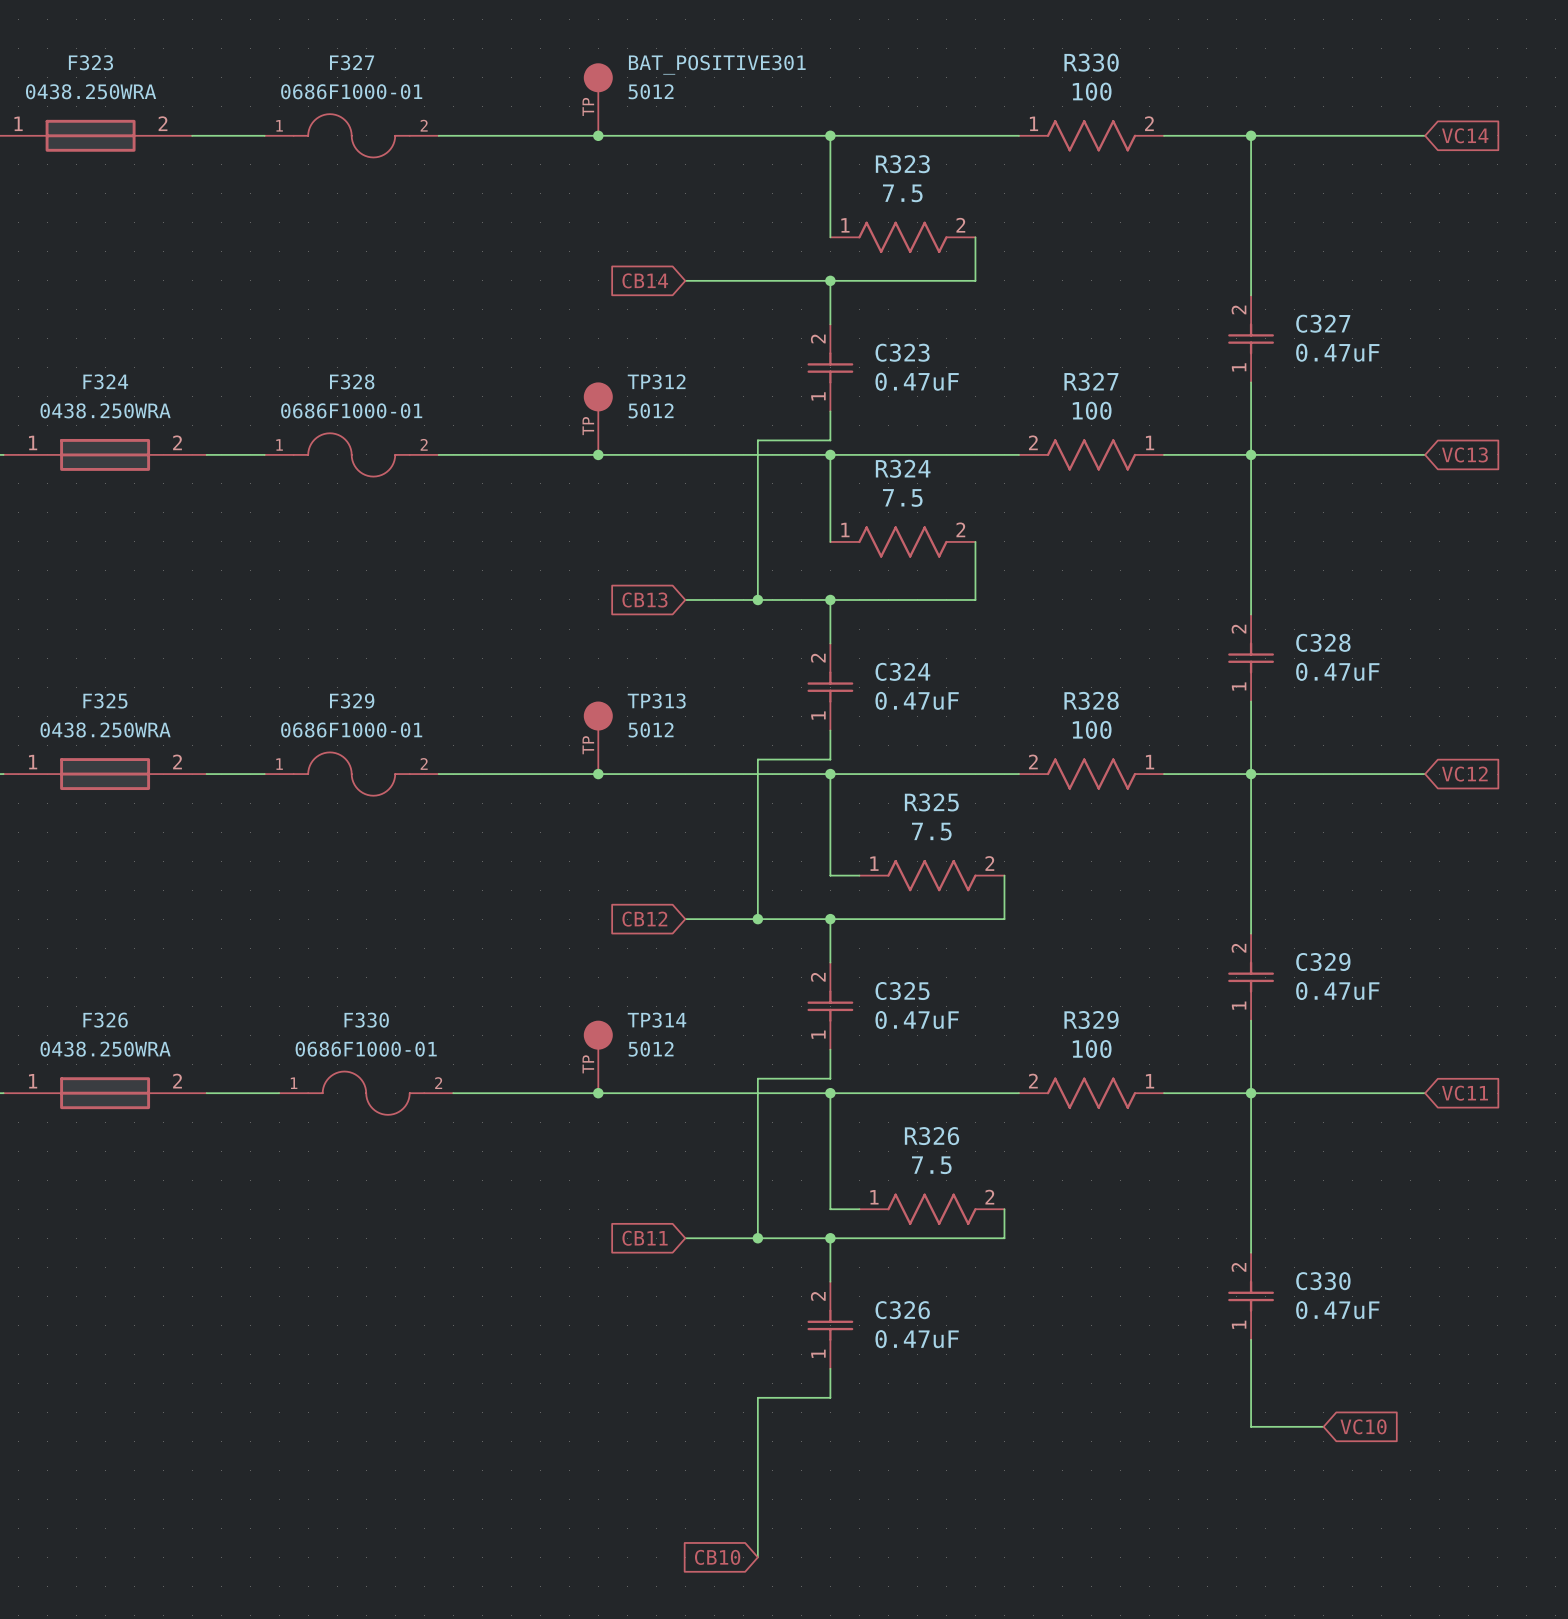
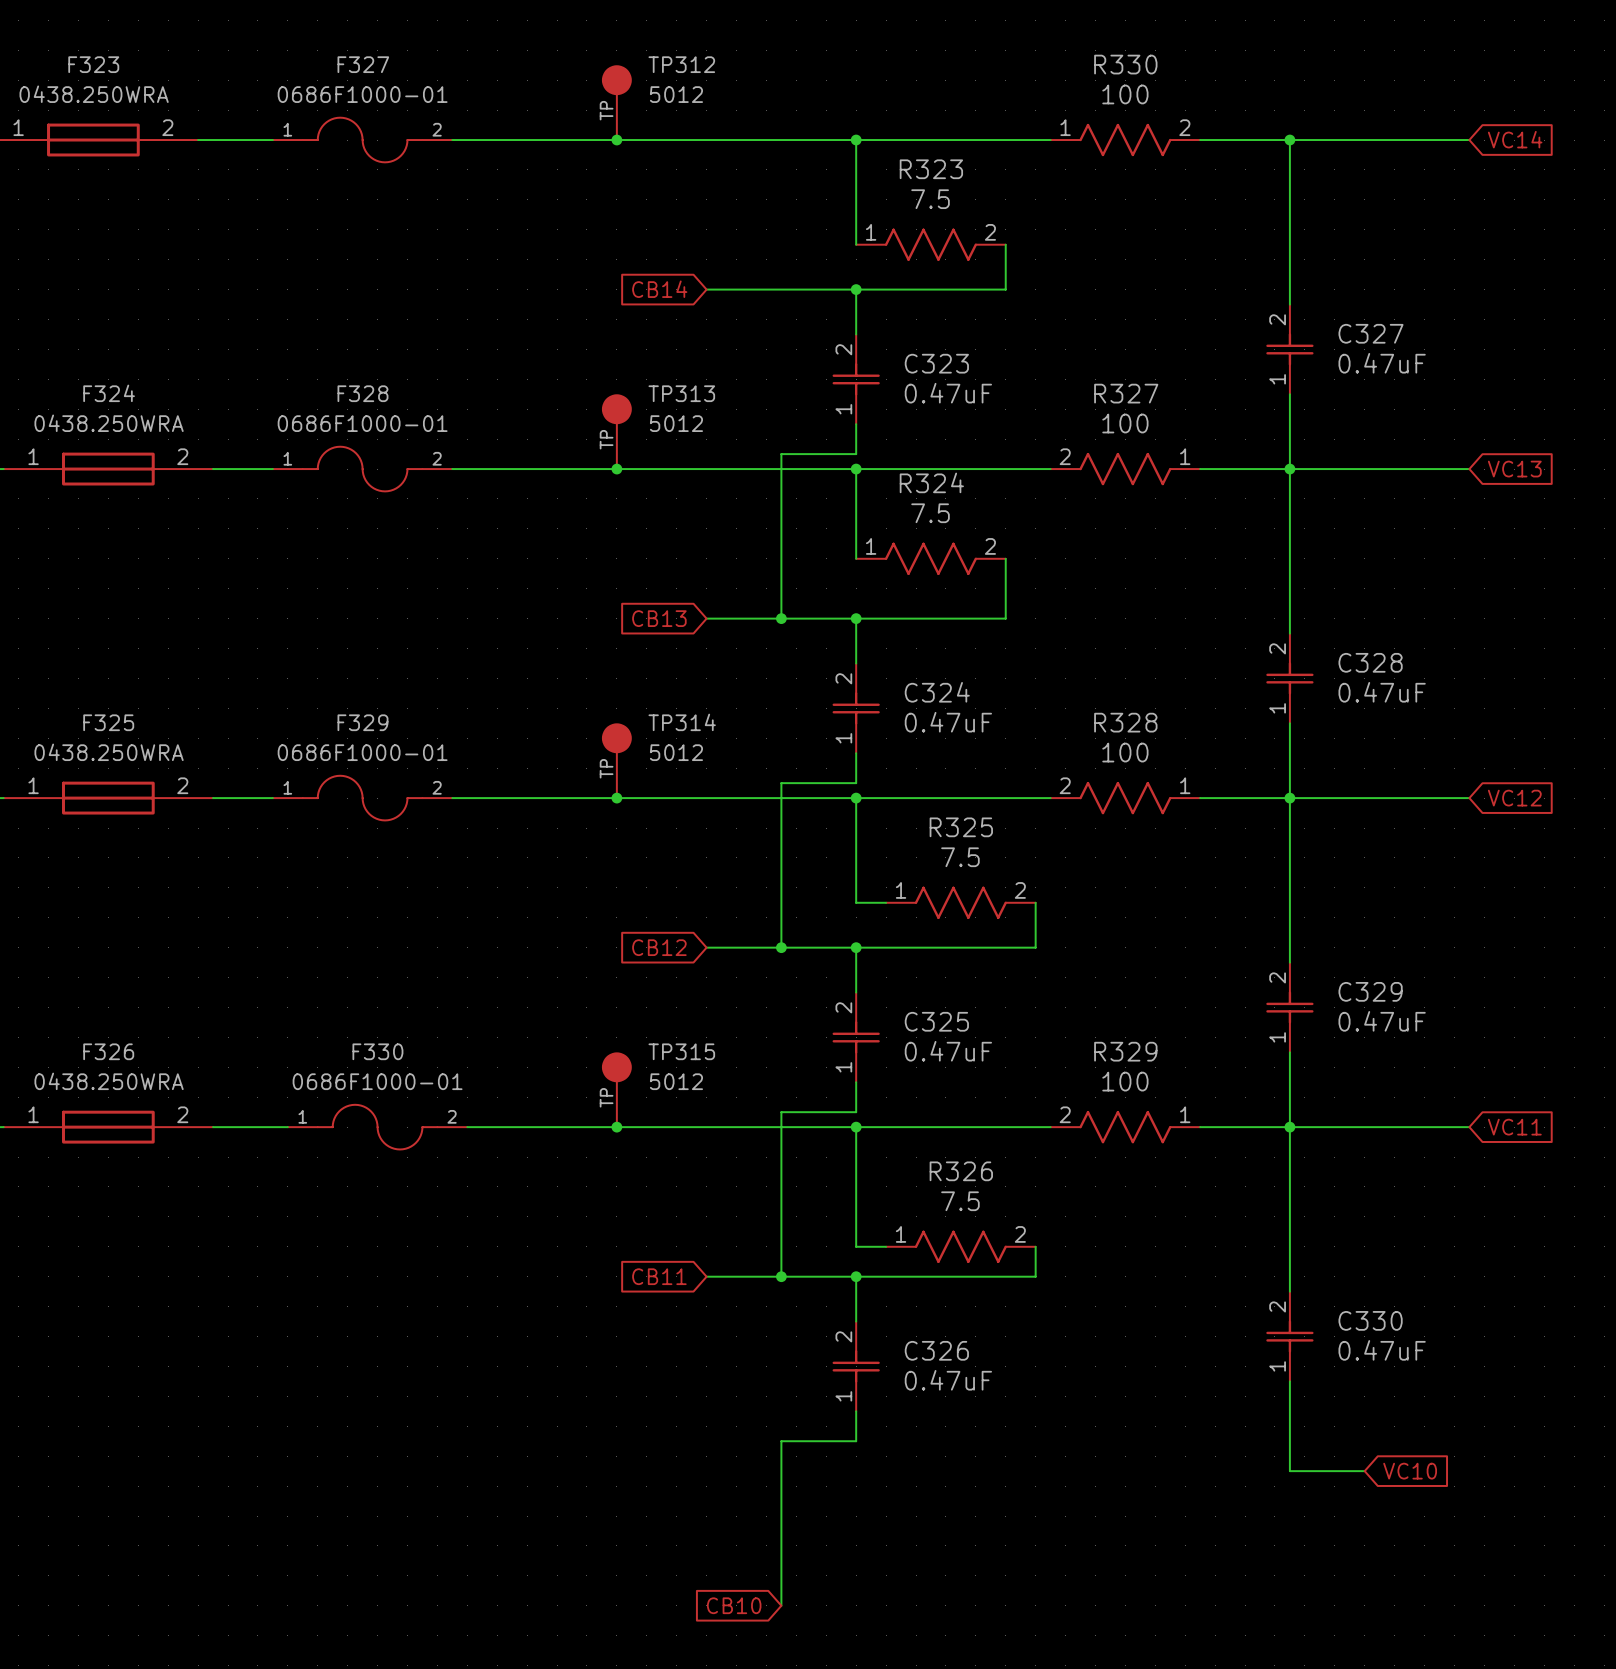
BAT_POSITIVE301 name: BAT_POSITIVE301 (717, 64) -> TP312 (681, 64)
TP312 name: TP312 (656, 381) -> TP313 (681, 393)
TP313 name: TP313 (656, 701) -> TP314 (682, 722)
TP314 name: TP314 (657, 1020) -> TP315 (681, 1051)

